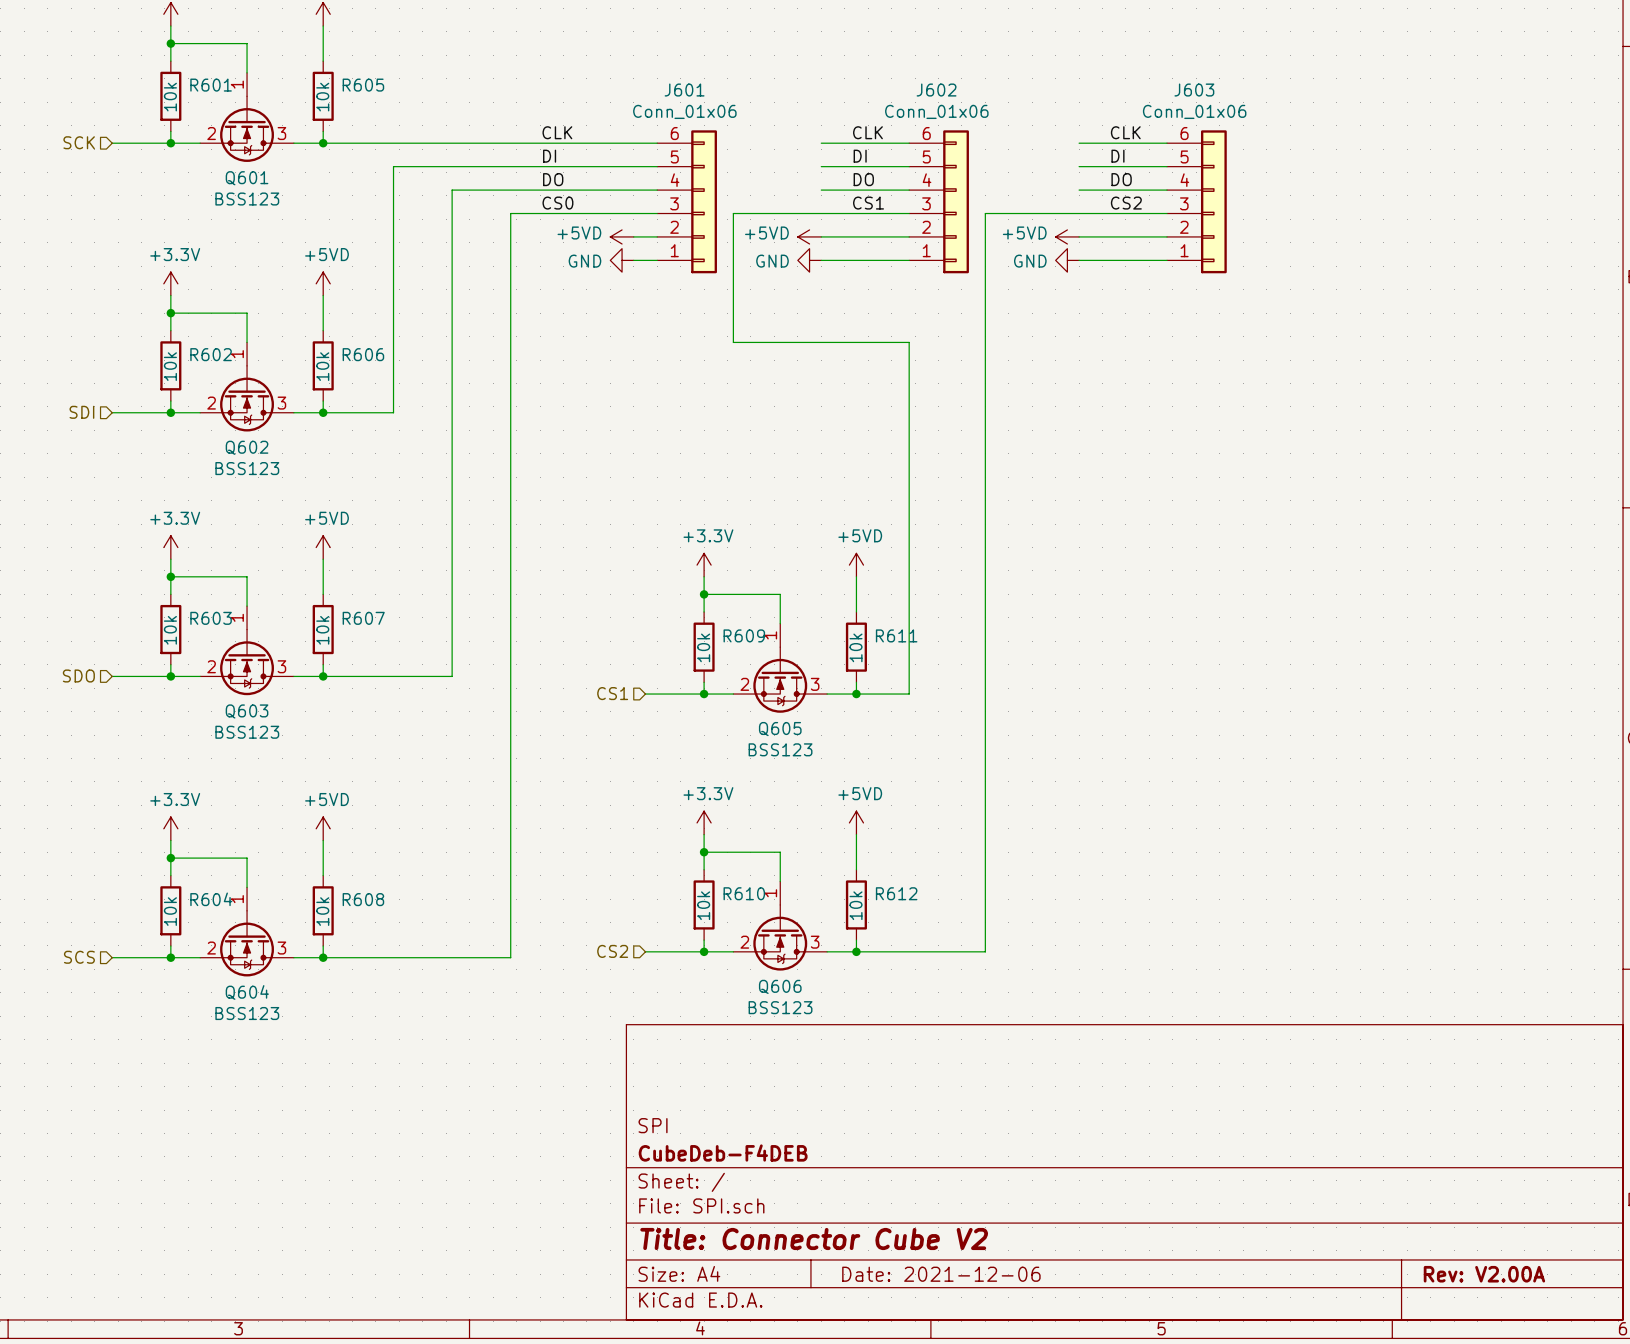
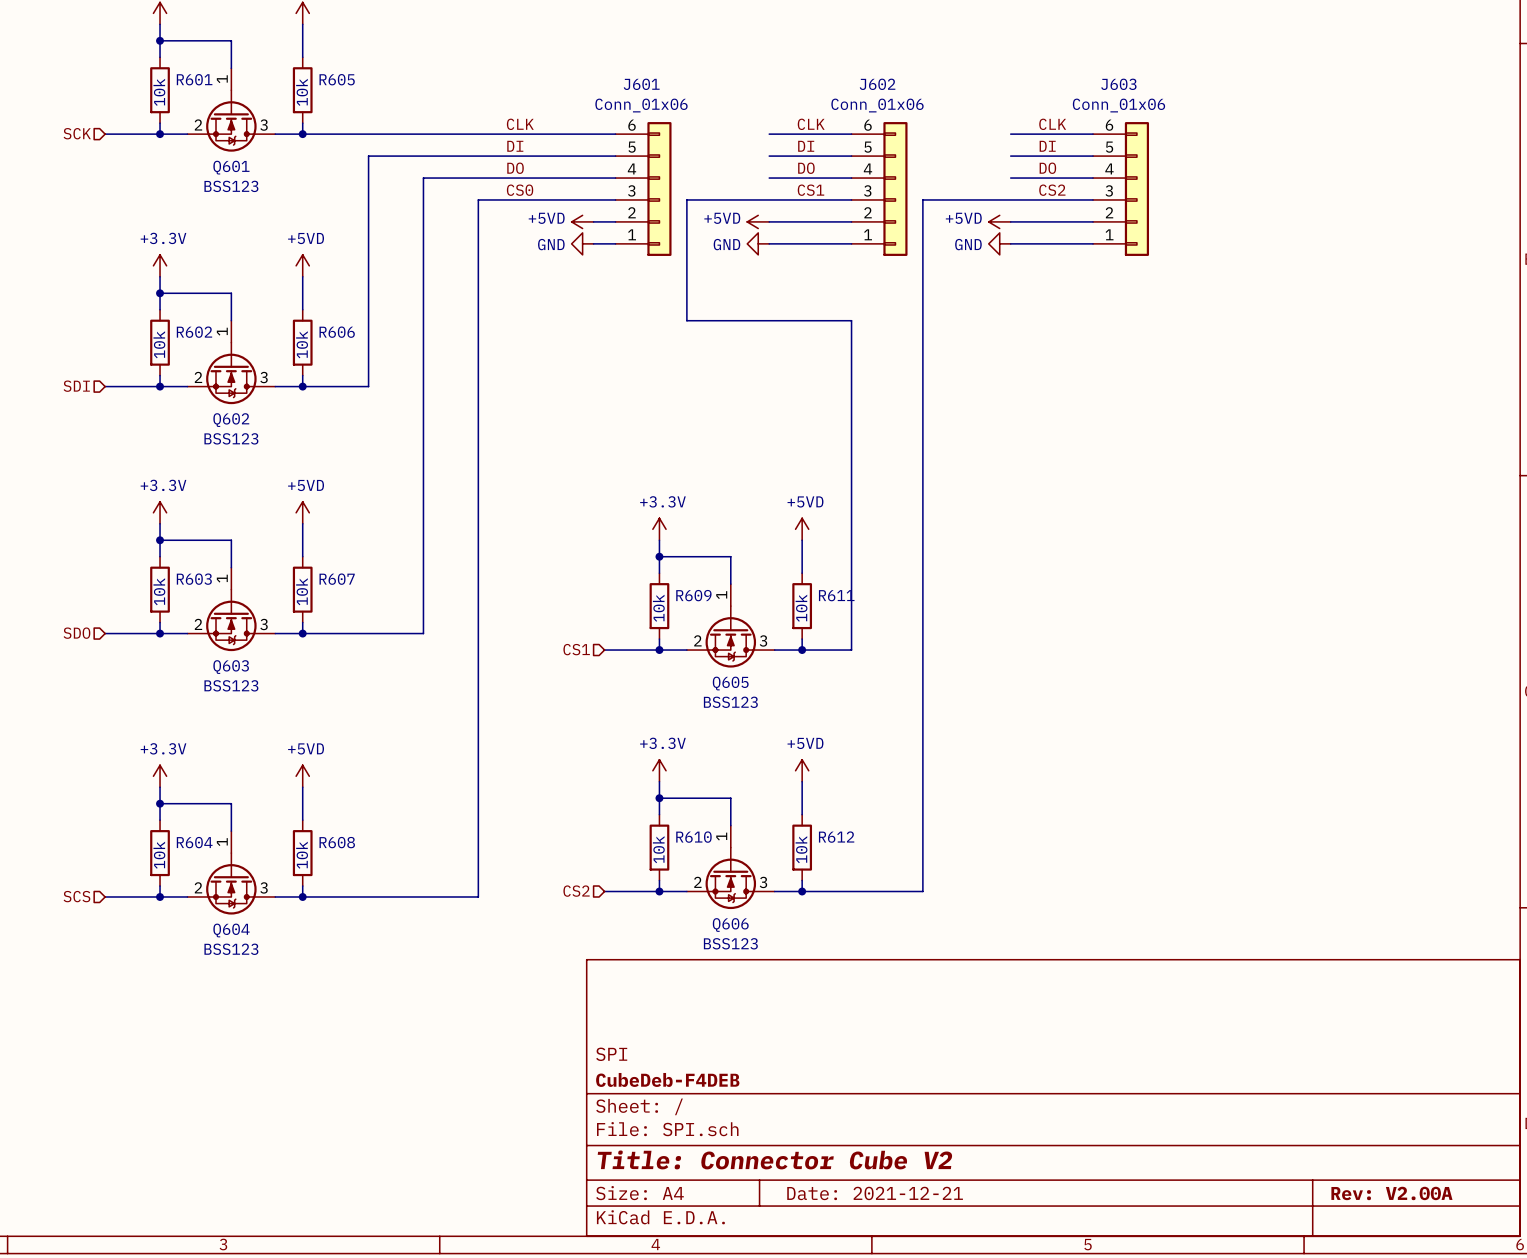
title block: Date: 2021-12-06 (941, 1274) -> Date: 2021-12-21 (875, 1193)

